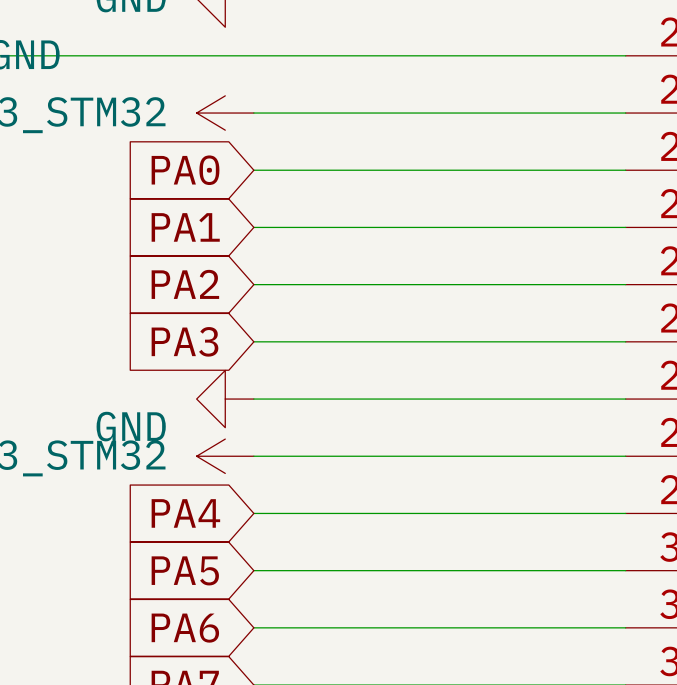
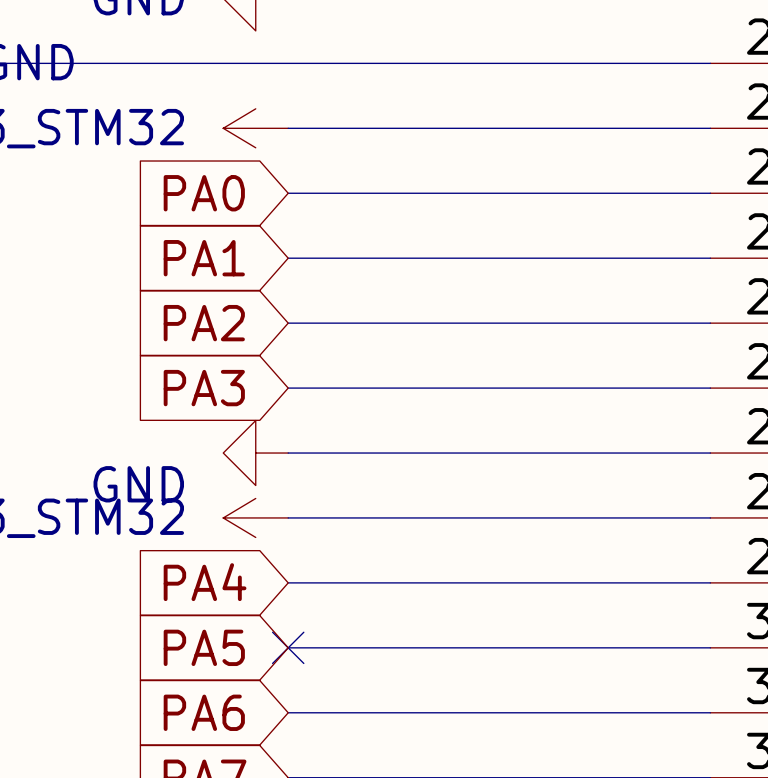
no-connect mark: none -> (288, 647)

